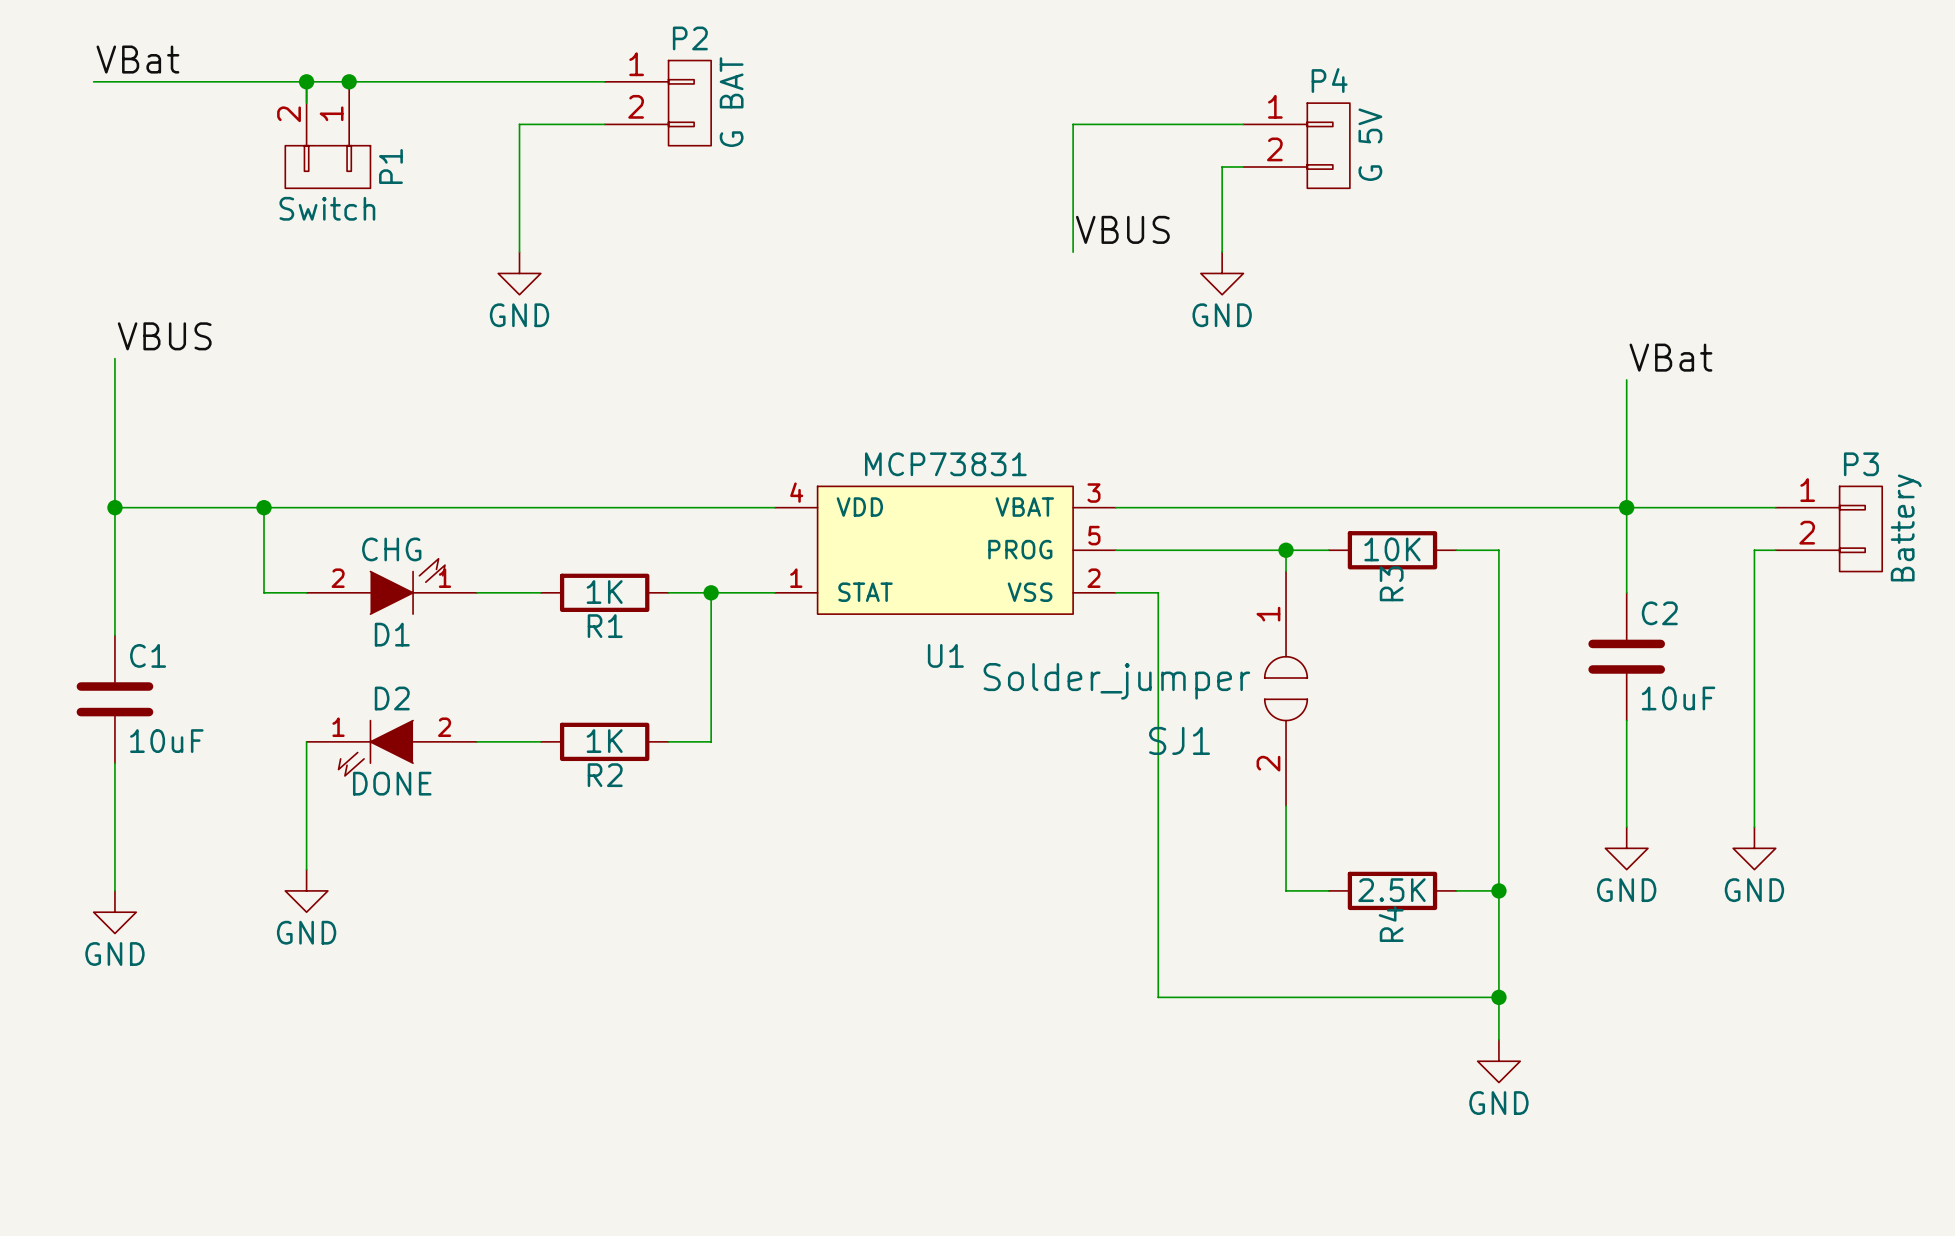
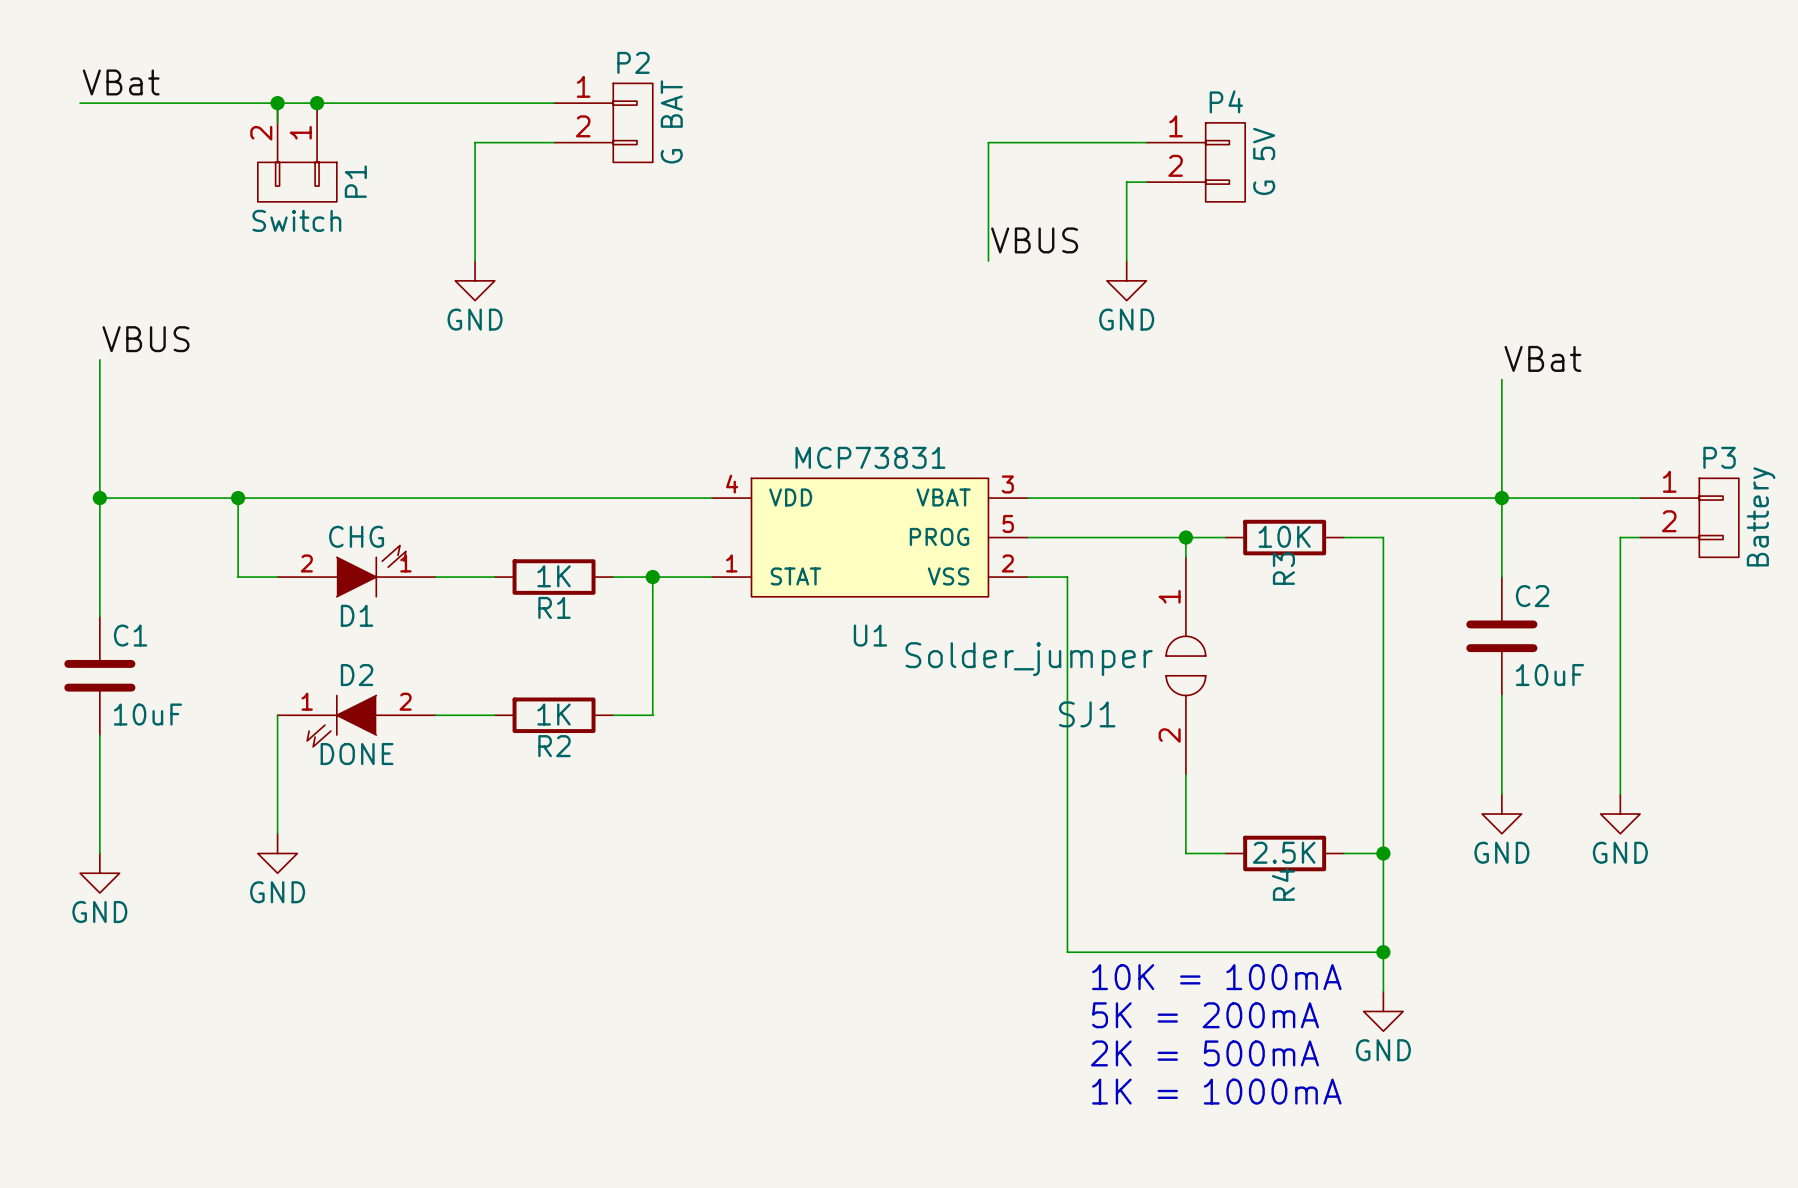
text: none -> 10K = 100mA (1216, 977)
text: none -> 5K = 200mA (1205, 1015)
text: none -> 2K = 500mA (1204, 1053)
text: none -> 1K = 1000mA (1216, 1091)

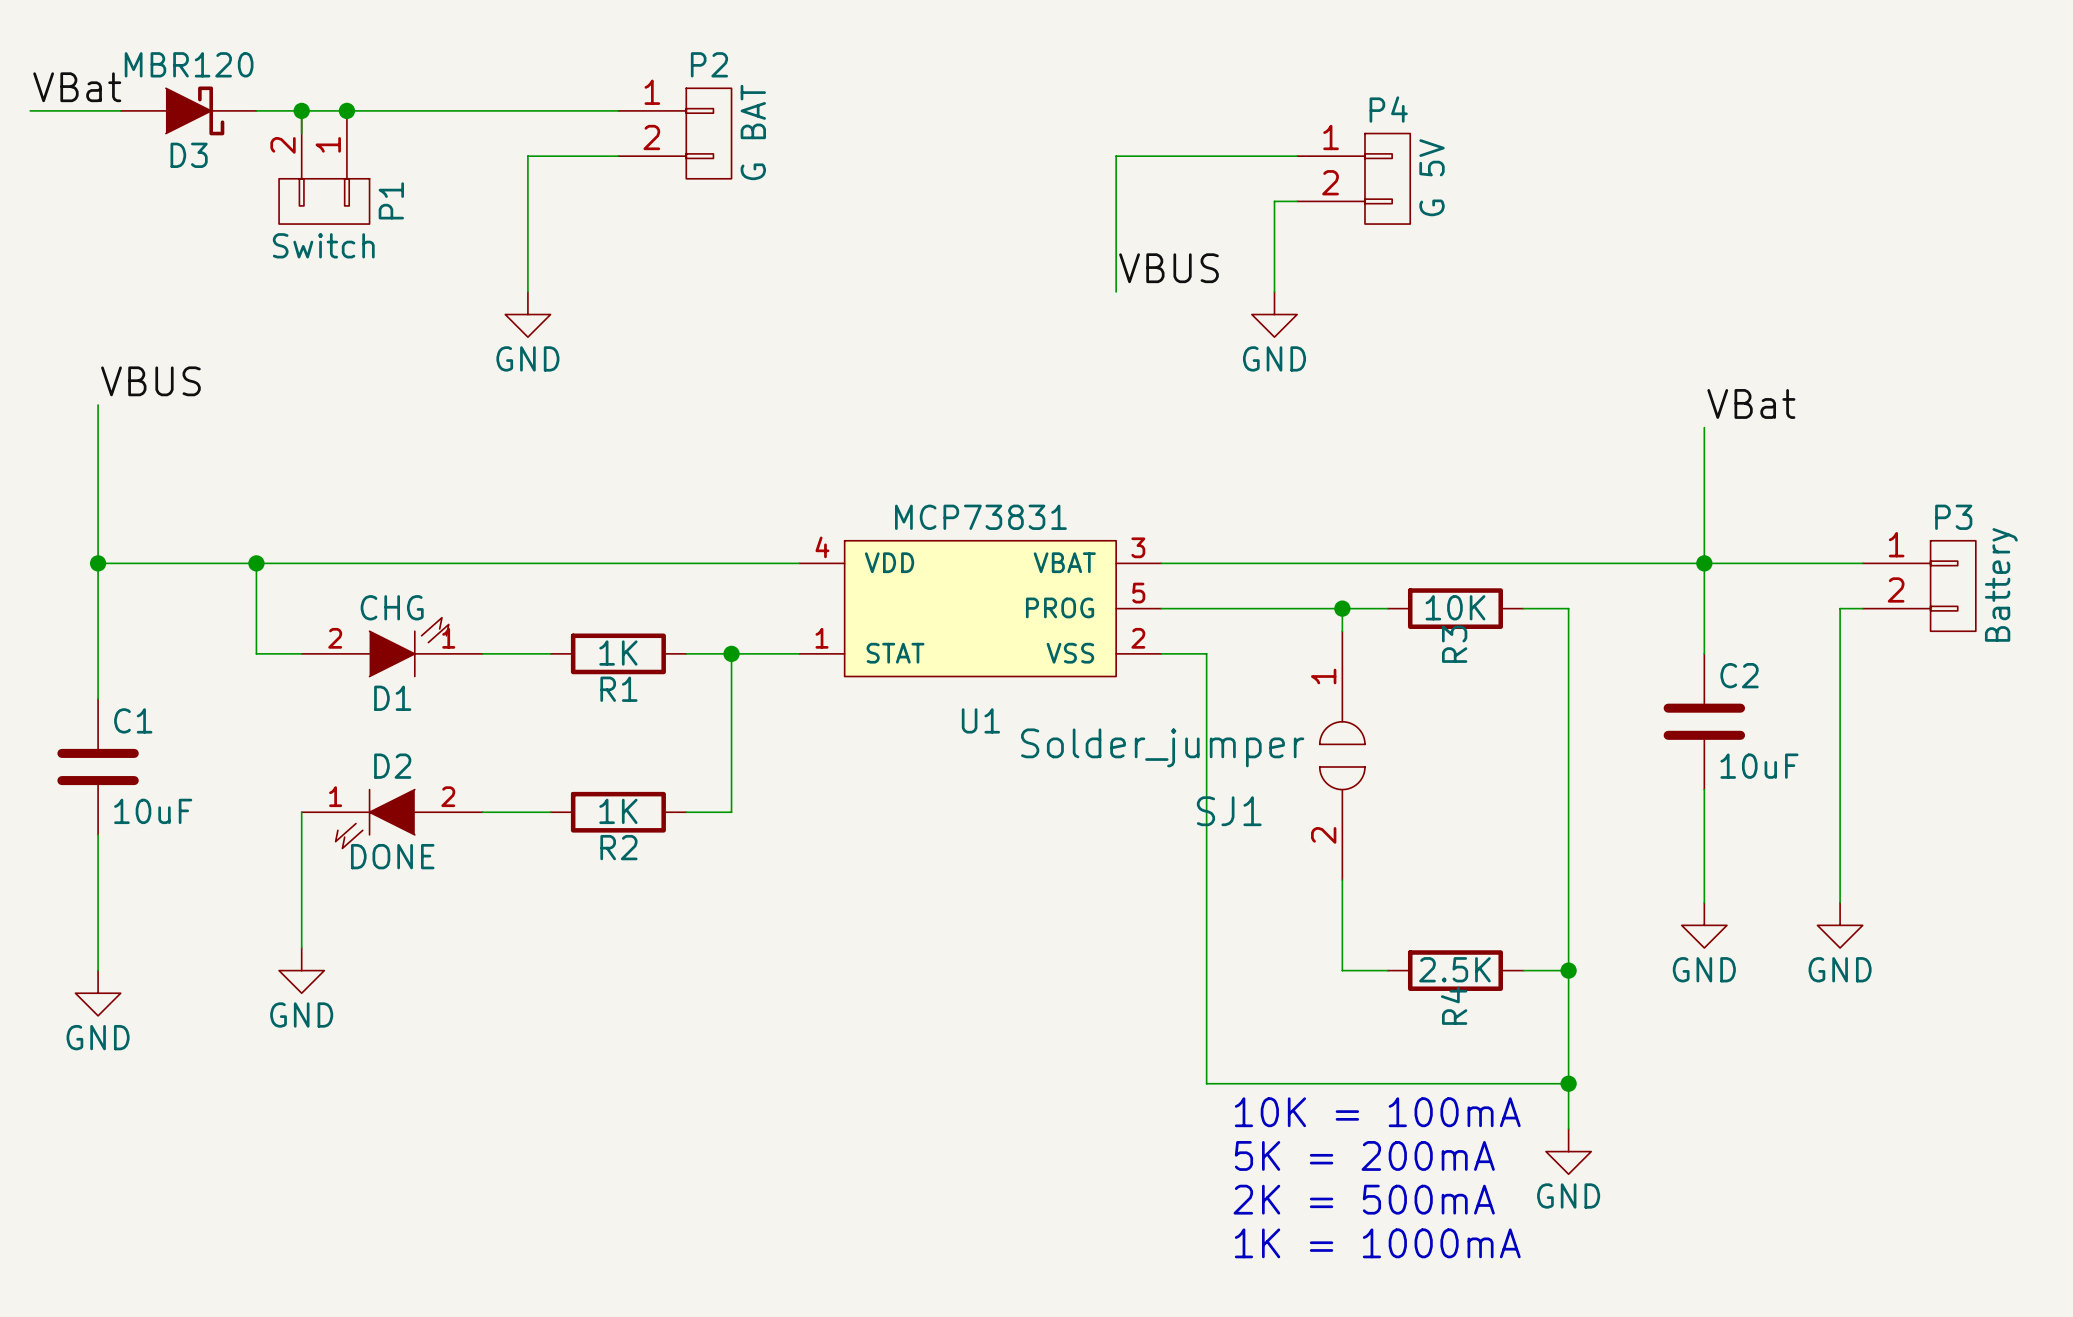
label position: VBat (121, 82) -> VBat (77, 87)
wire: none -> (30, 110) (75, 110)
D3: none -> MBR120 (188, 110)

